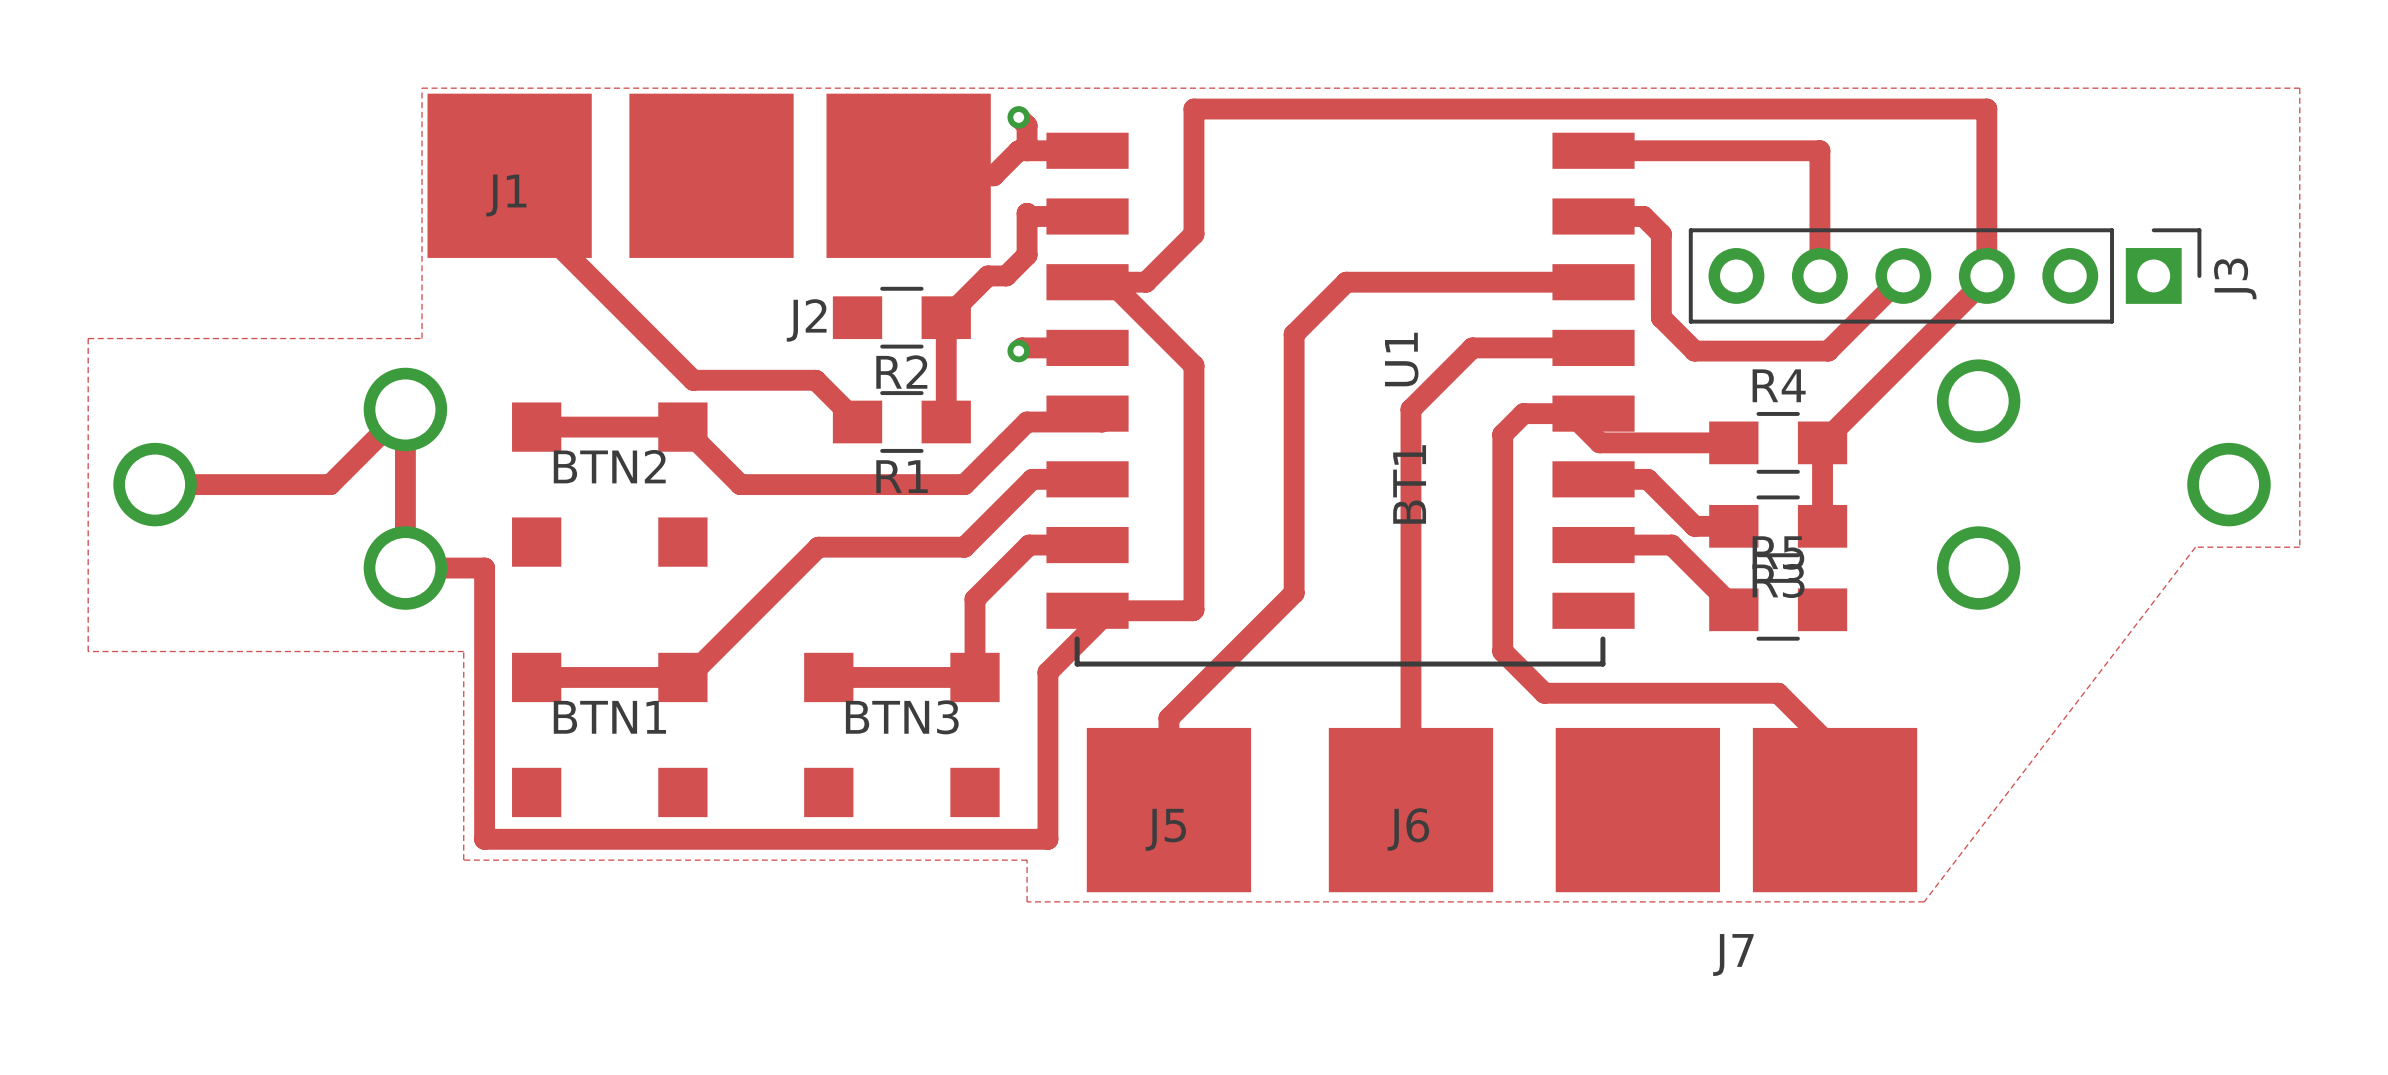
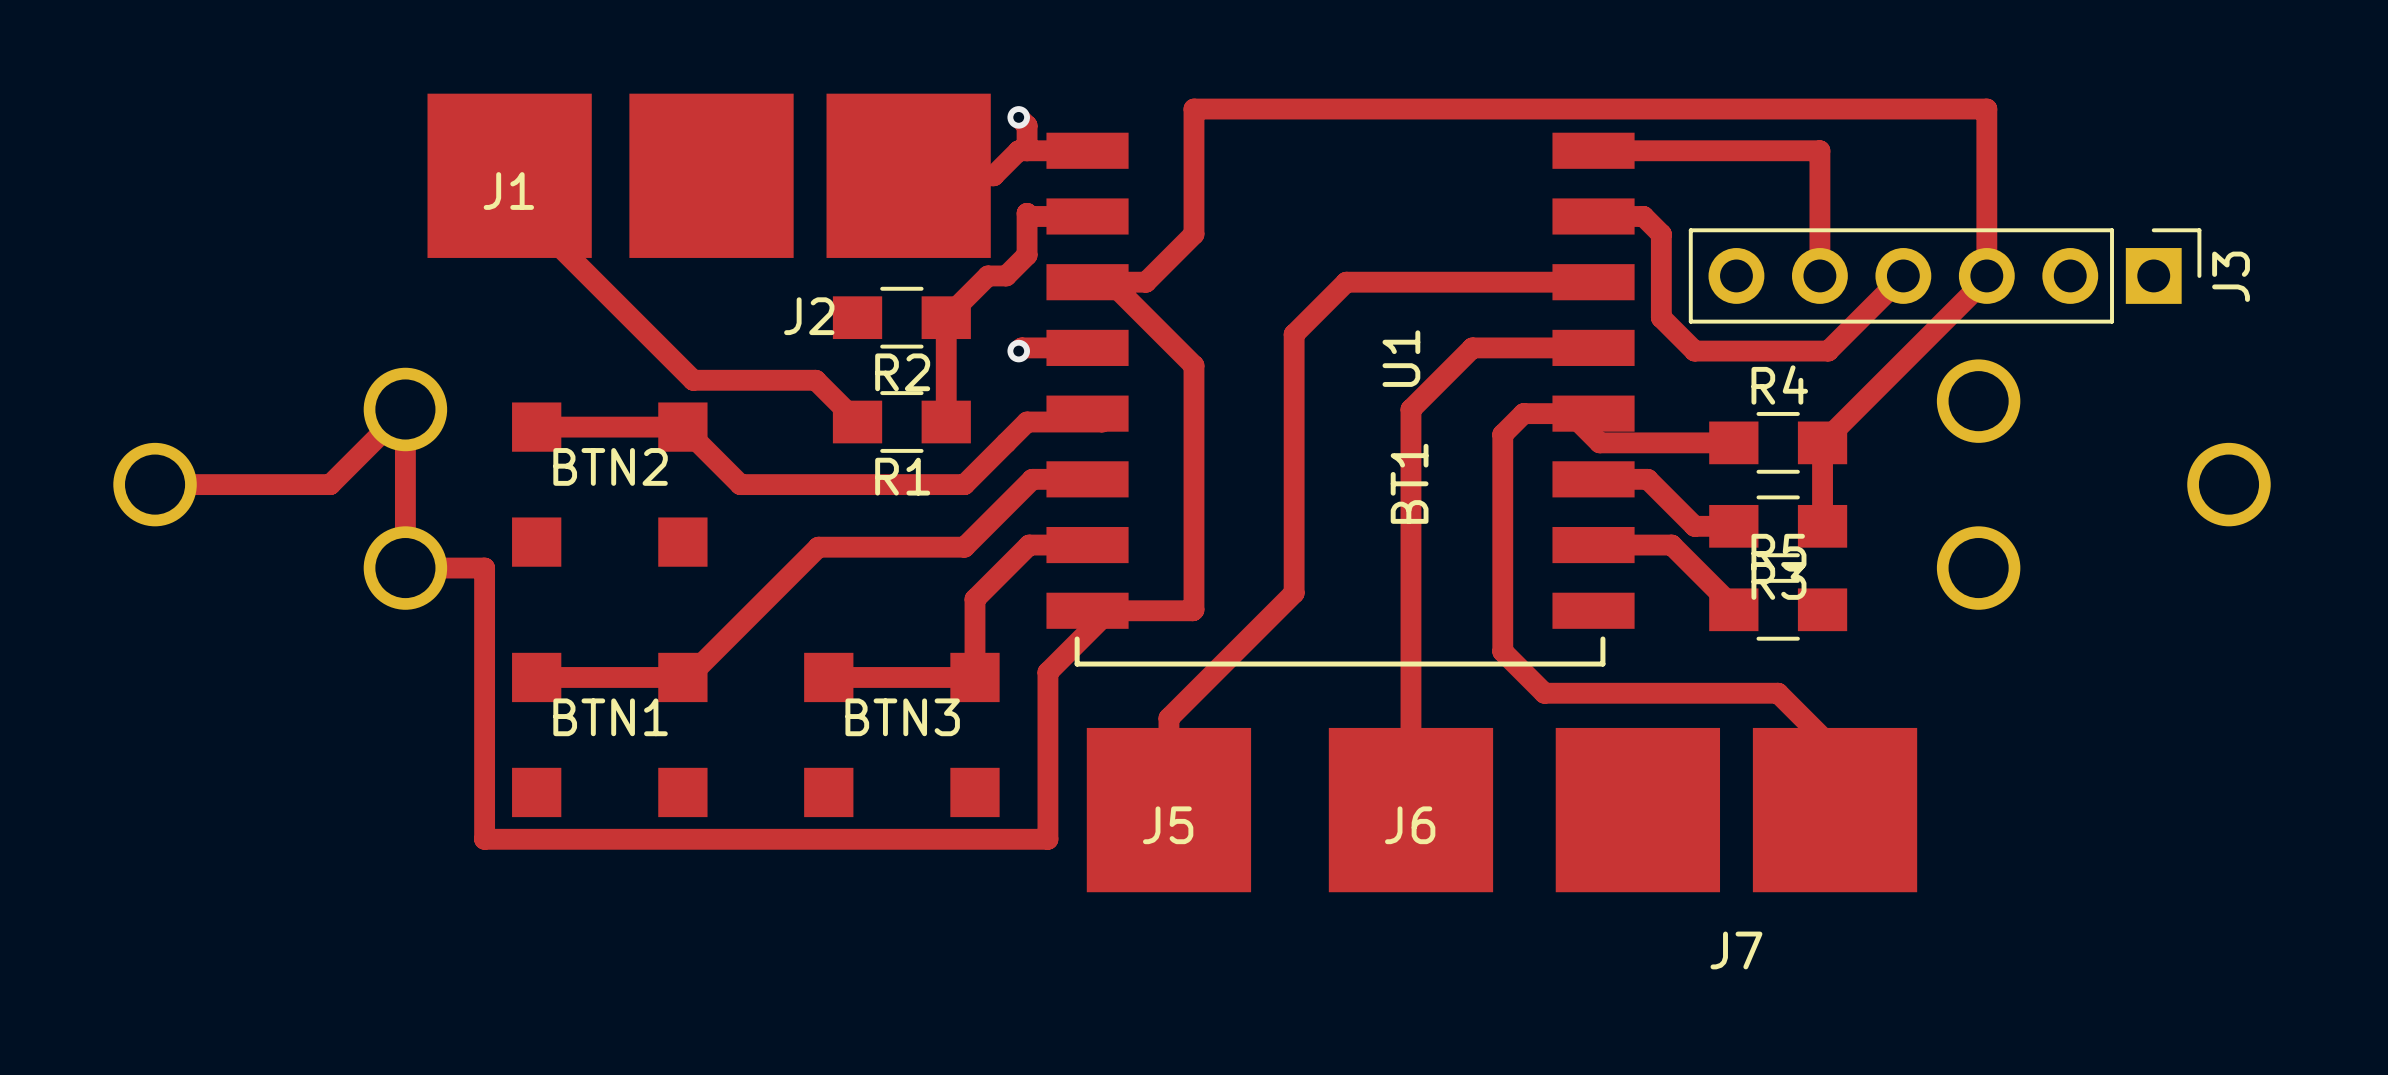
zone outline: (422, 88) (422, 338) (88, 338) (88, 651) (463, 651) (463, 860) (1027, 860) (1027, 901) (1924, 901) (2195, 547) (2299, 547) (2299, 88) (422, 88) -> none

